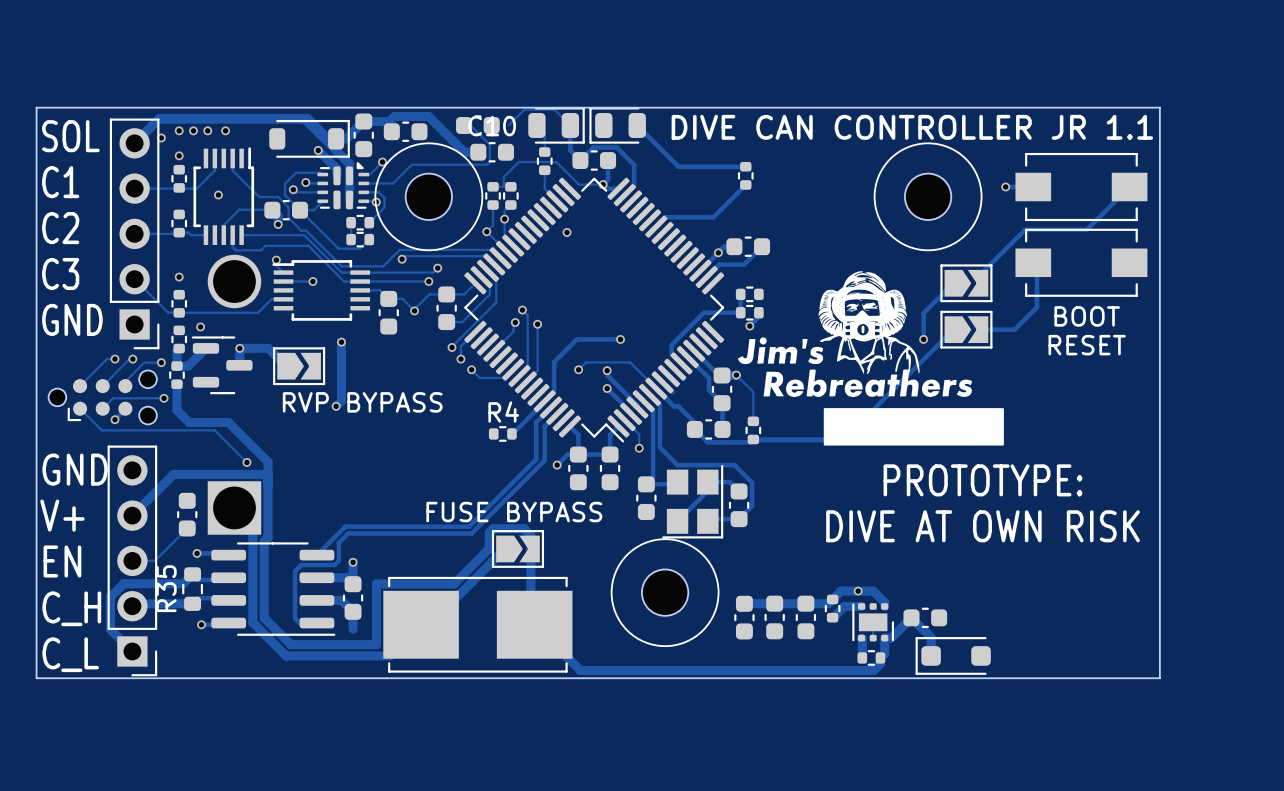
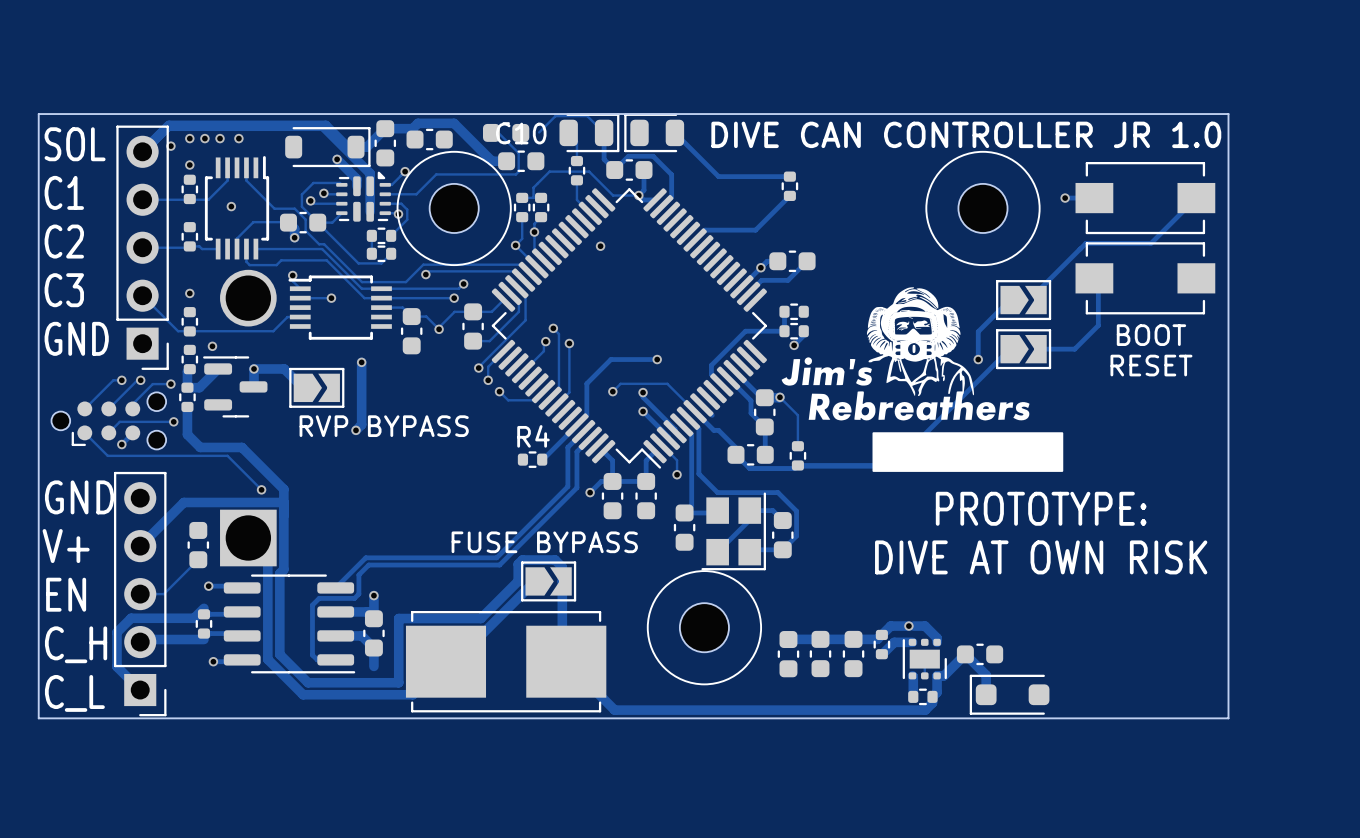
text: DIVE CAN CONTROLLER JR 1.1 (912, 127) -> DIVE CAN CONTROLLER JR 1.0 (966, 134)
R35: (192, 589) -> none
part: none -> (203, 623)

